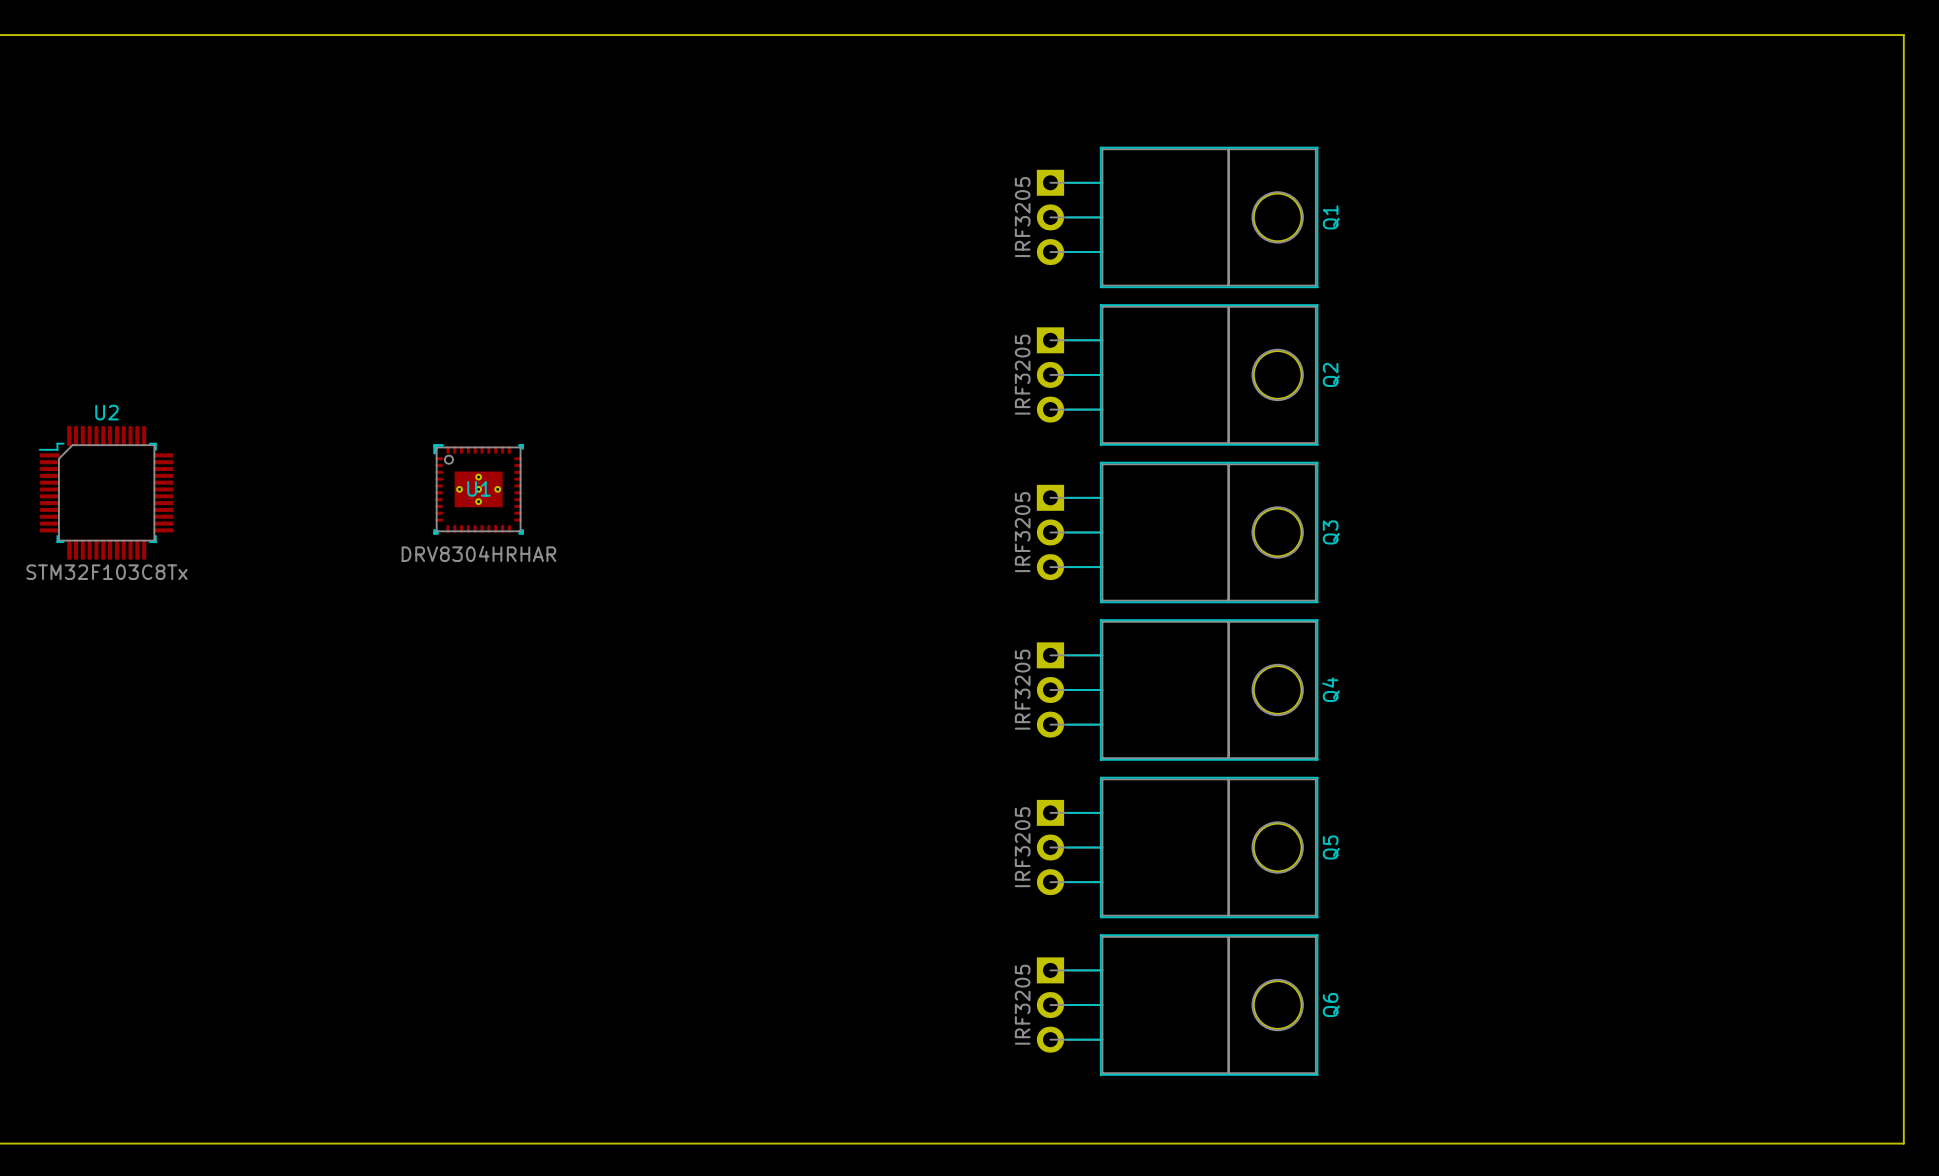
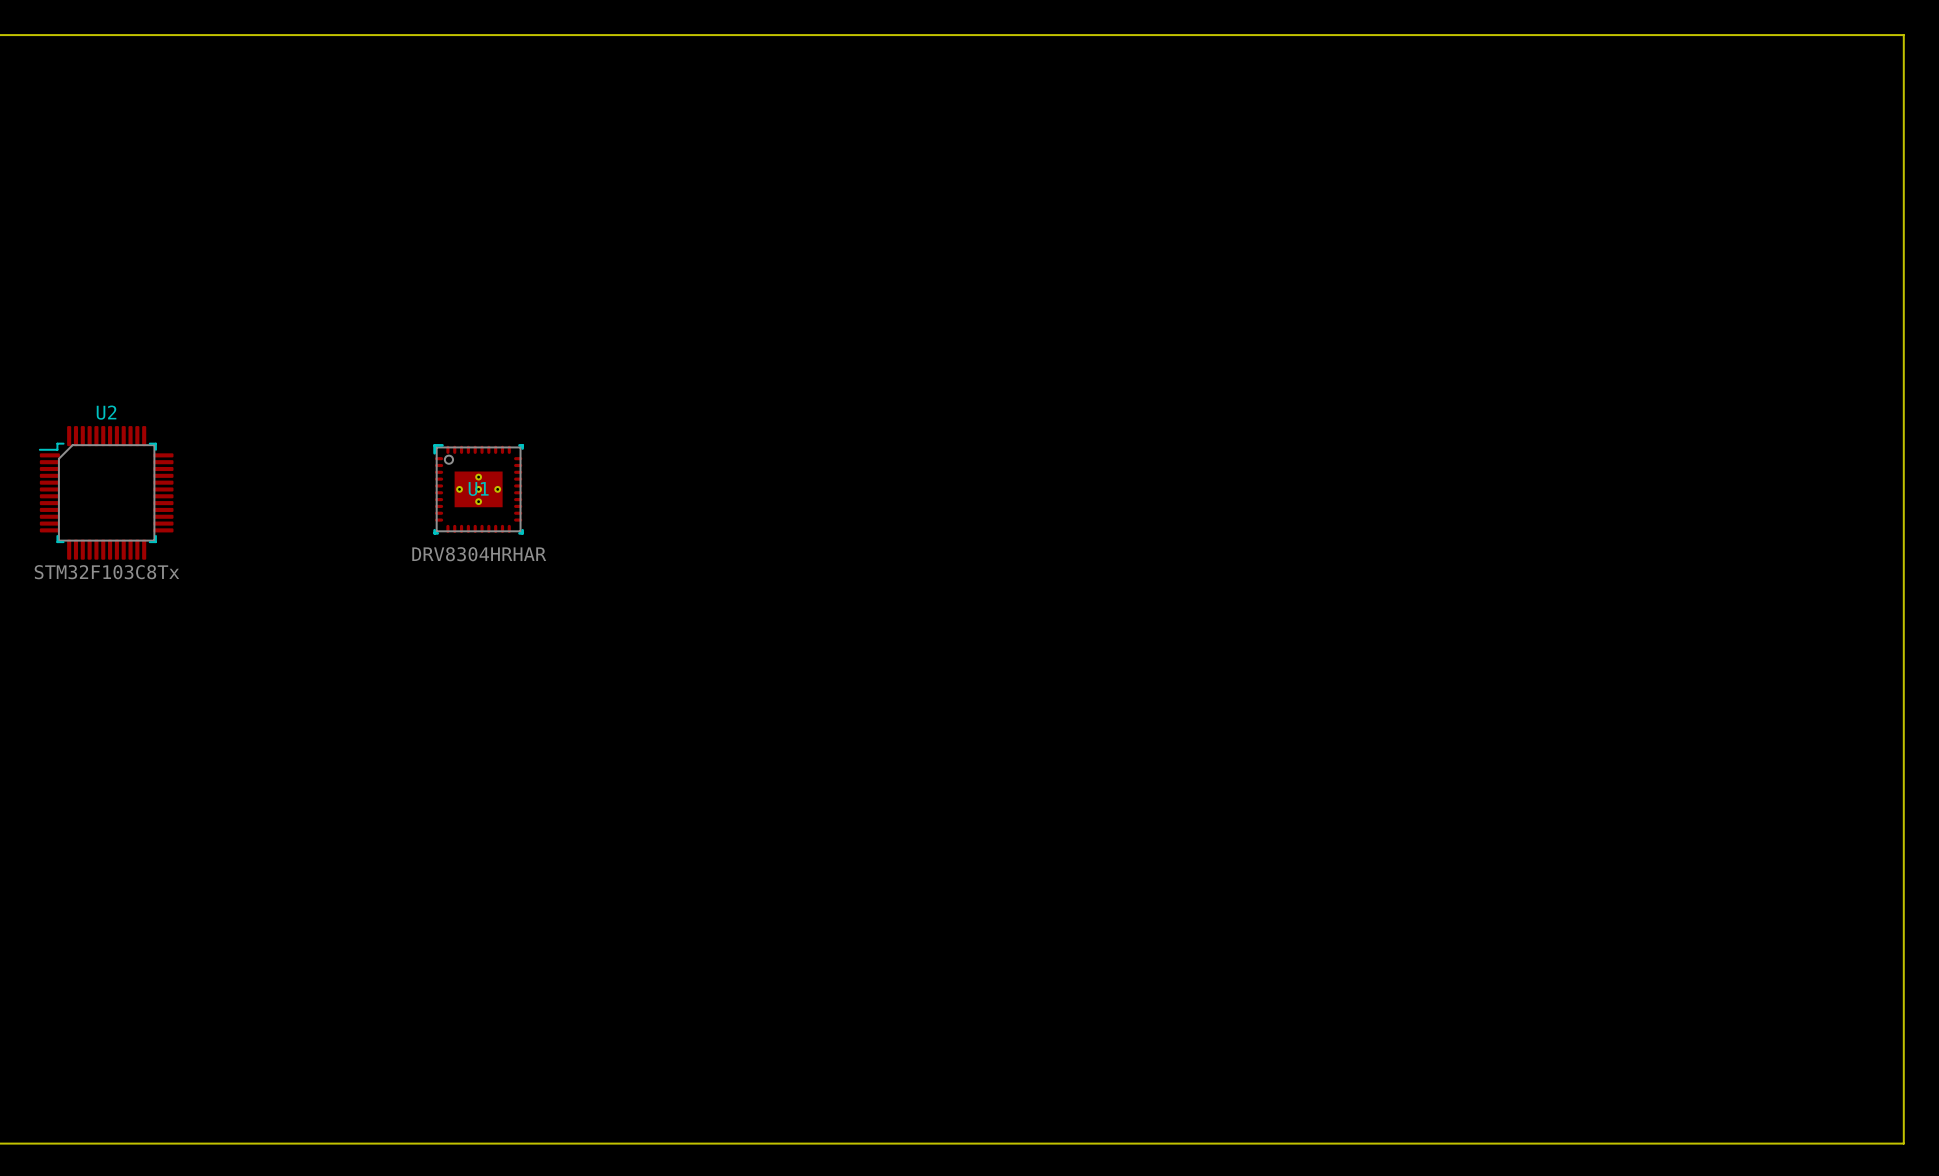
Q1: IRF3205 (1177, 217) -> none
Q2: IRF3205 (1177, 374) -> none
Q3: IRF3205 (1177, 532) -> none
Q4: IRF3205 (1177, 689) -> none
Q5: IRF3205 (1177, 847) -> none
Q6: IRF3205 (1177, 1005) -> none

